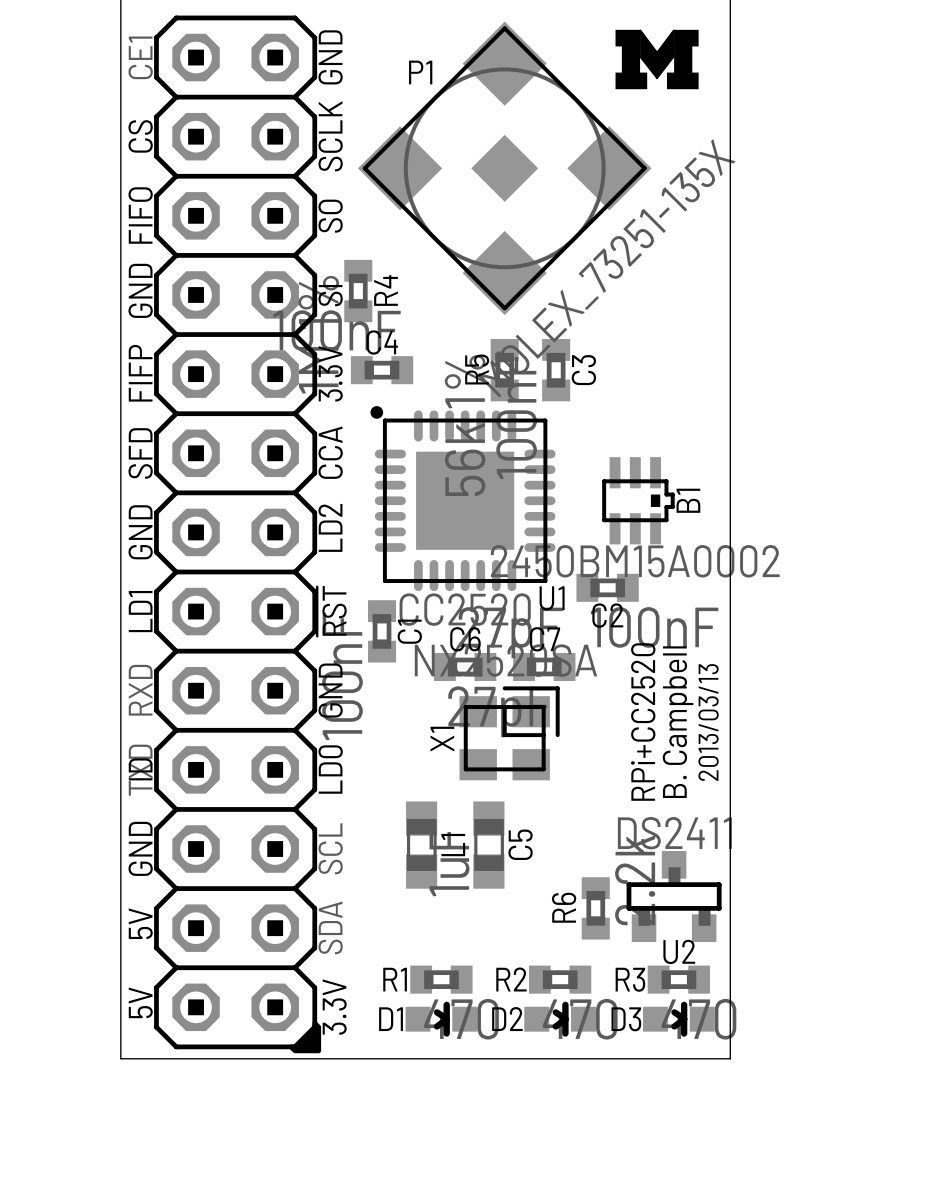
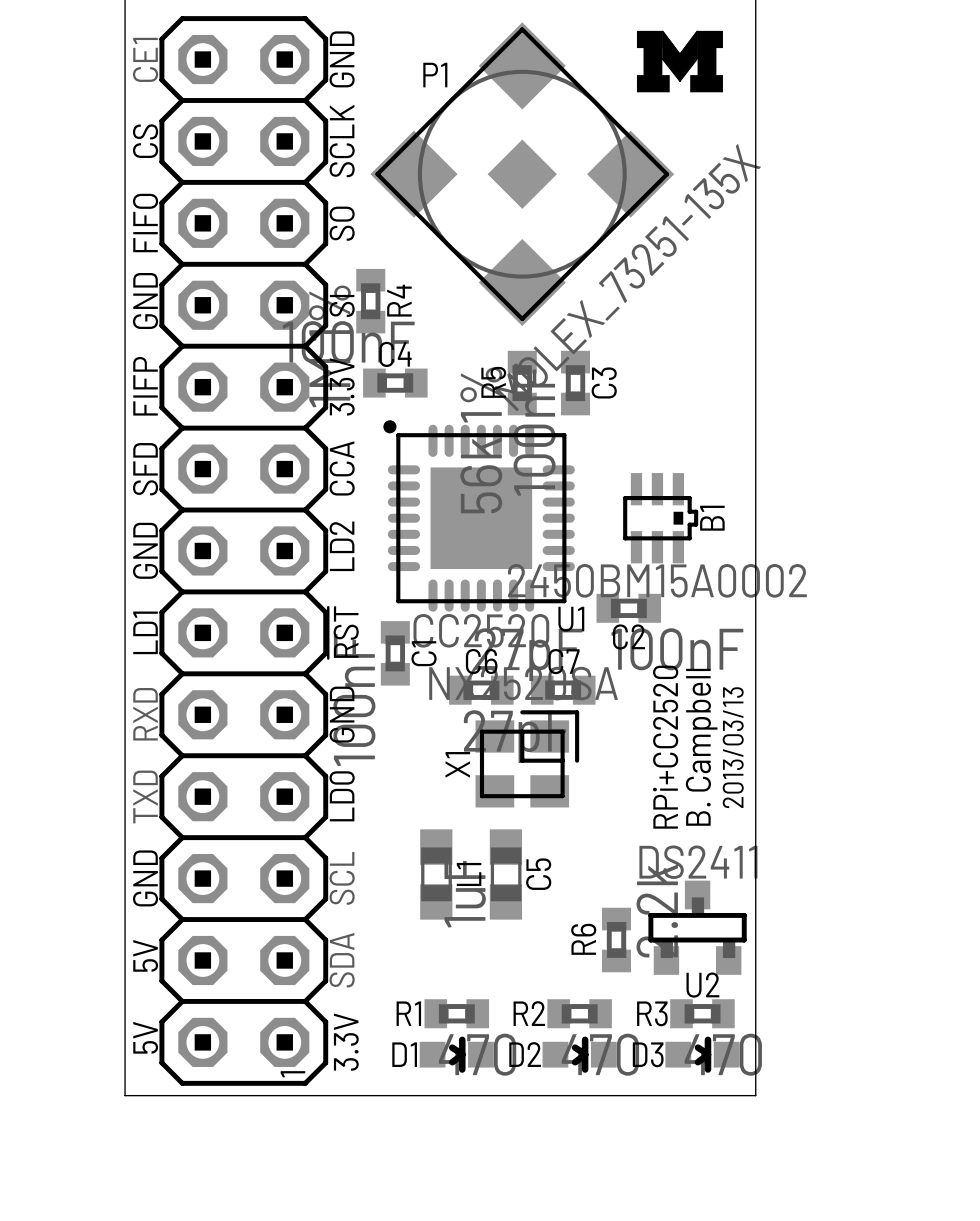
text: ID (140, 769) -> none
drawing: [288, 1020, 322, 1054] -> none
text: none -> 1 (292, 1074)

